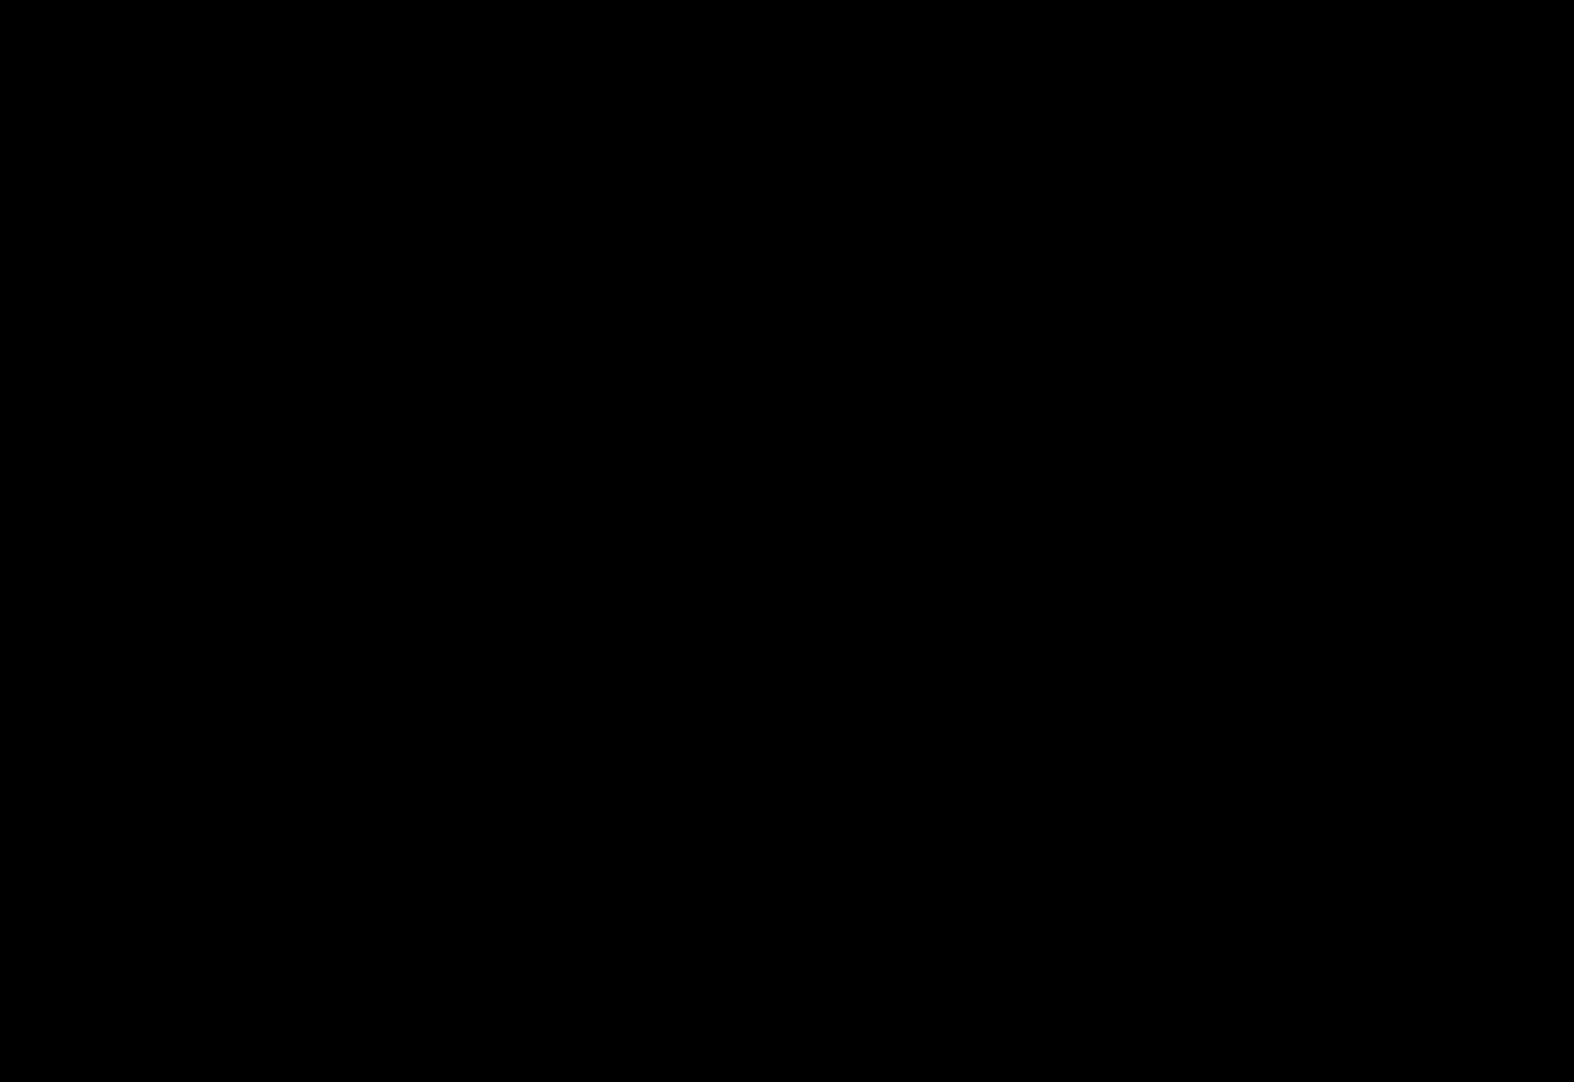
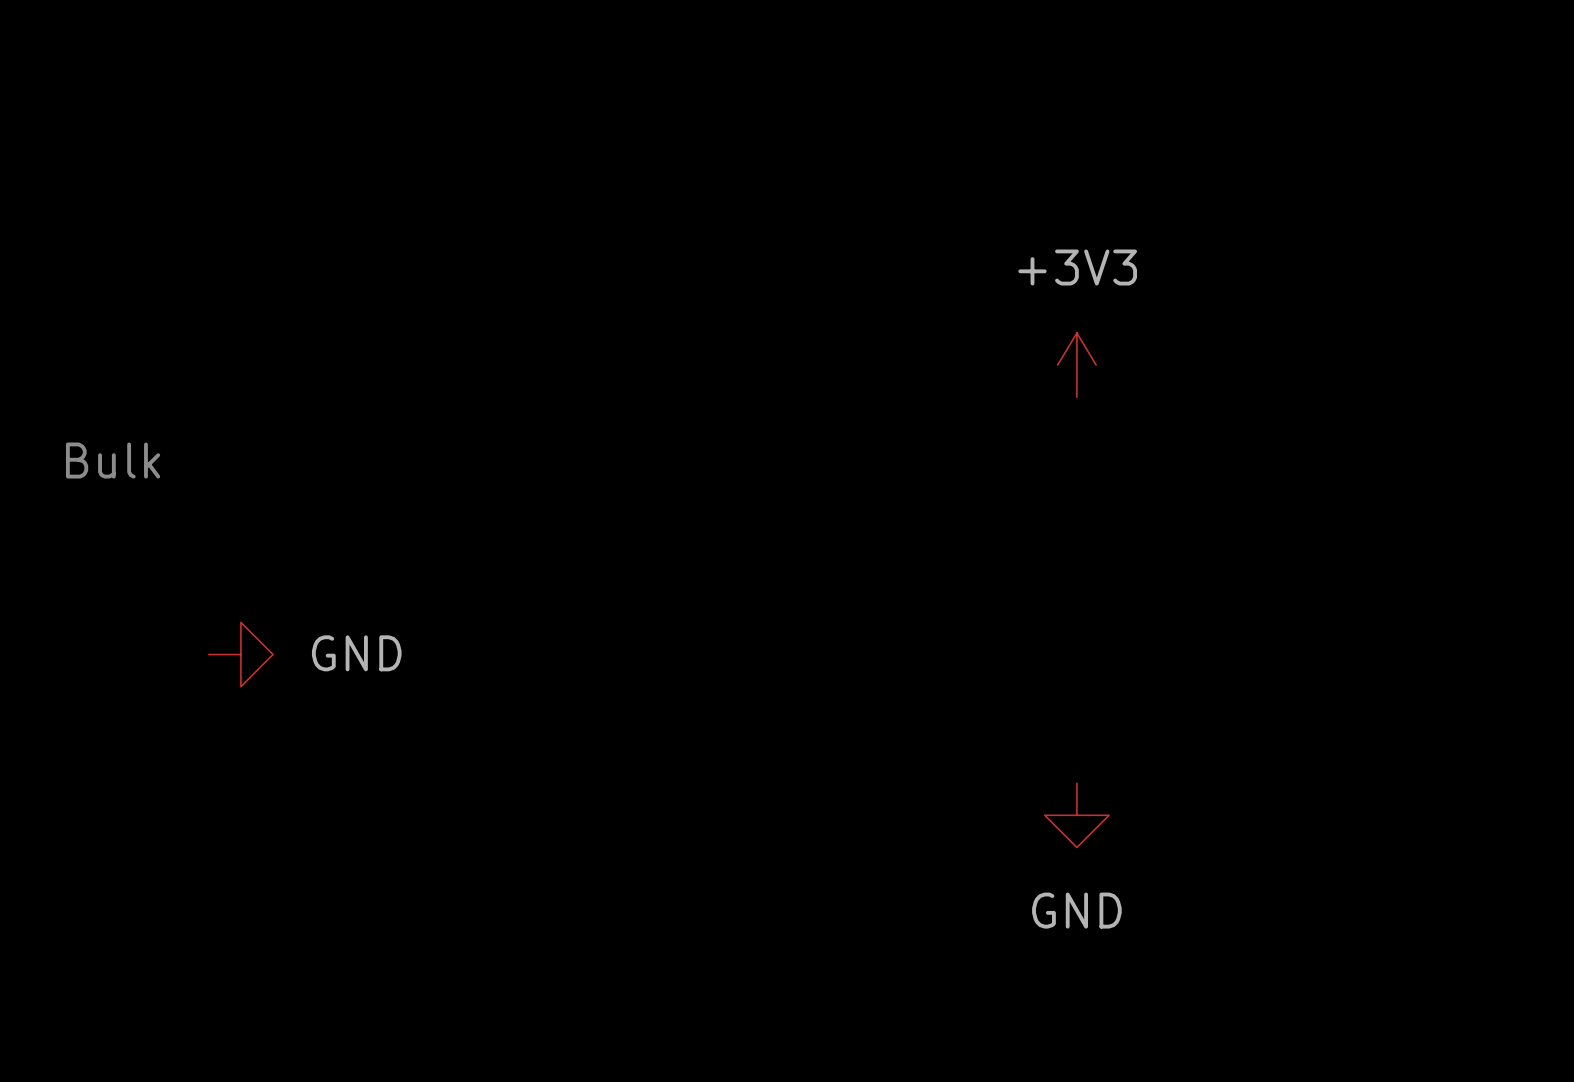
power symbol: none -> +3V3 (1076, 365)
text: none -> Bulk (113, 460)
power symbol: none -> GND (240, 654)
power symbol: none -> GND (1076, 815)

